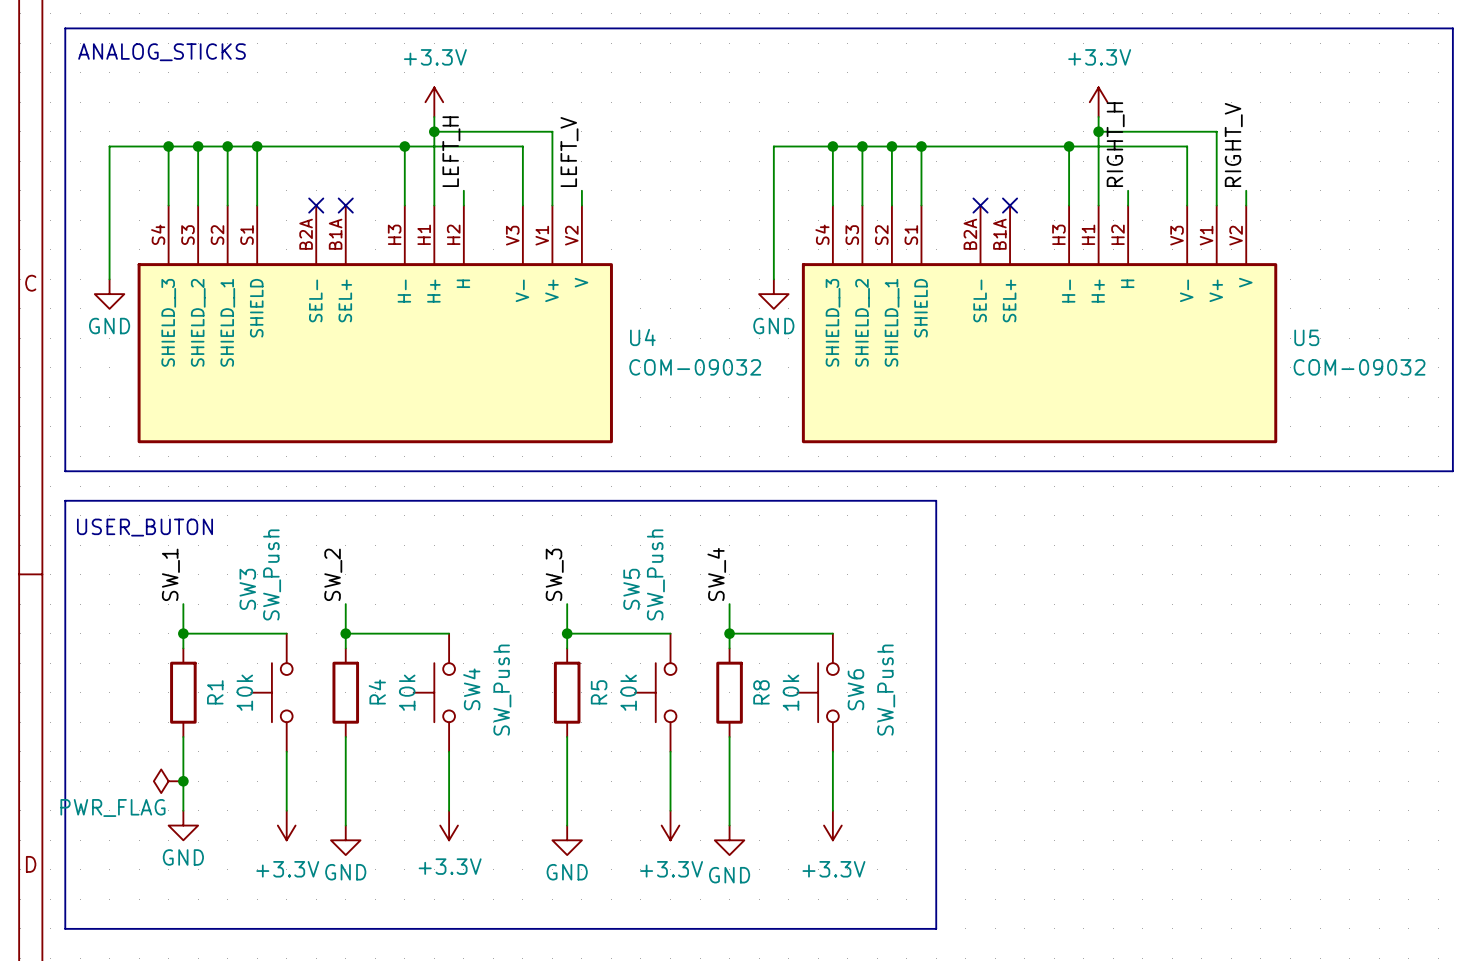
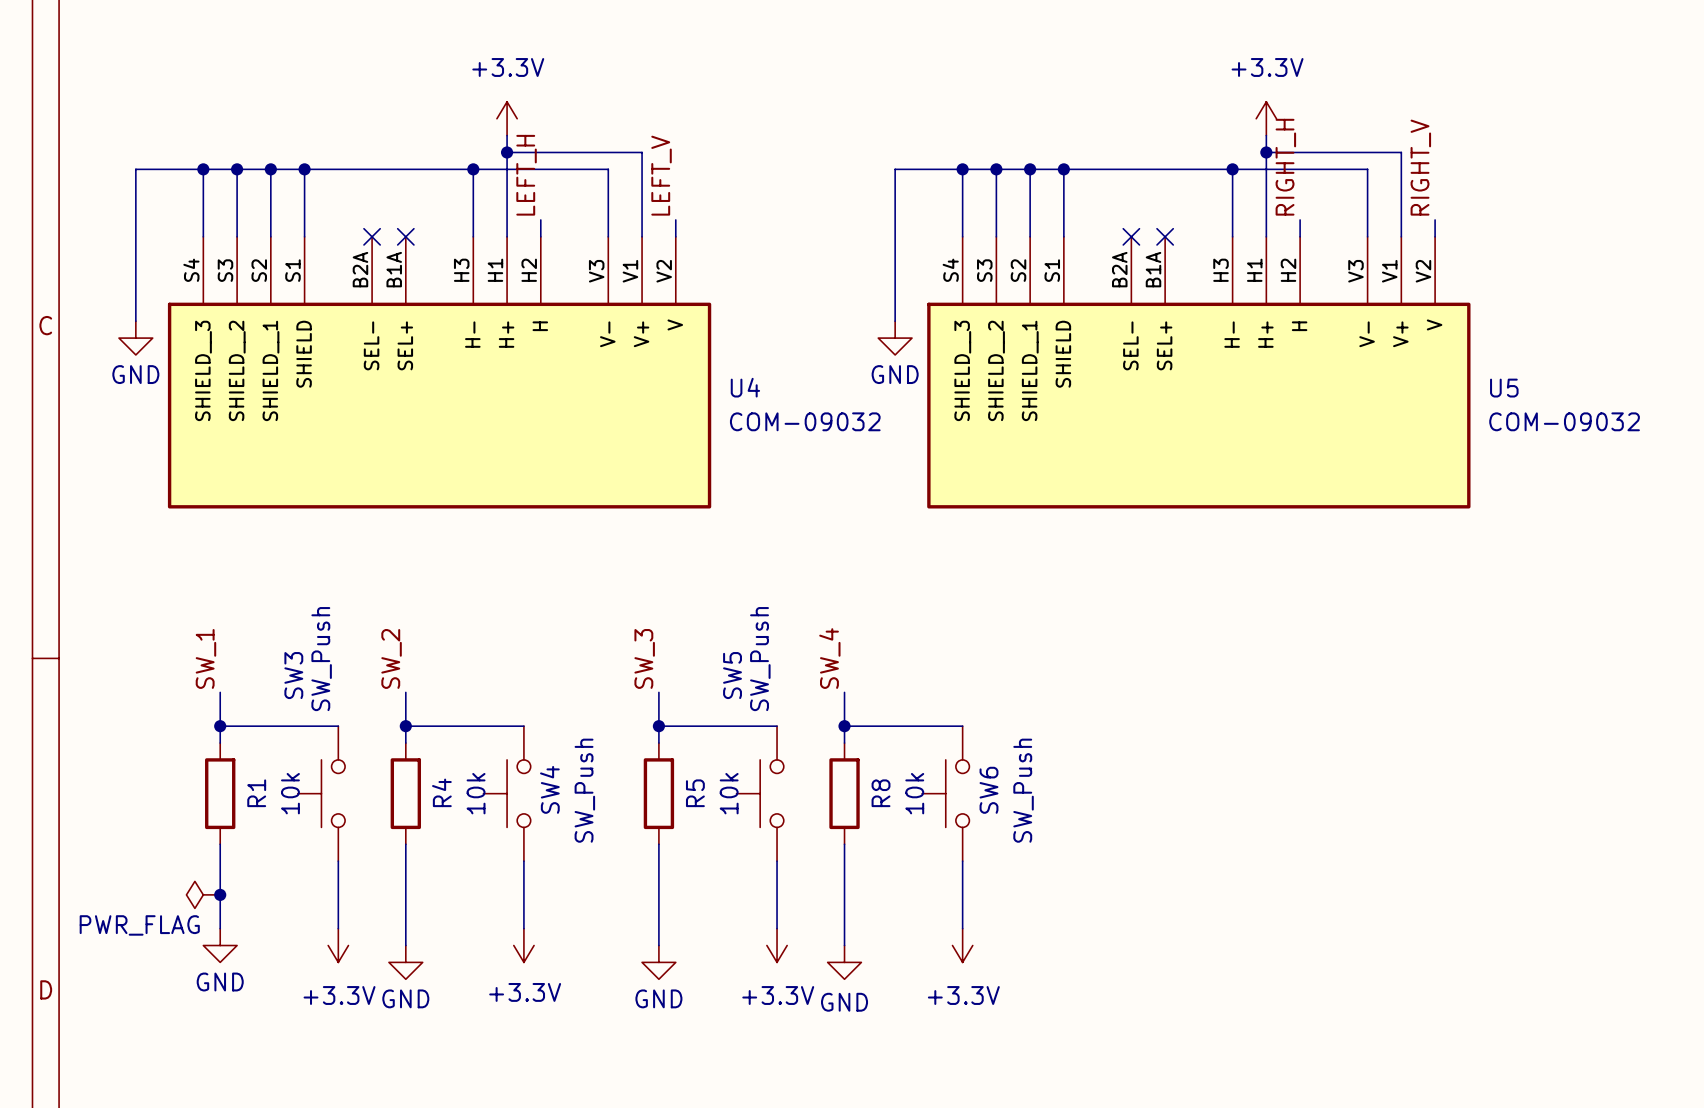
line: (65, 28) (65, 471) (1452, 471) (1452, 28) (65, 28) -> none
text: ANALOG_STICKS (162, 52) -> none
line: (65, 500) (936, 500) (936, 928) (65, 928) (65, 500) -> none
text: USER_BUTON (144, 527) -> none

